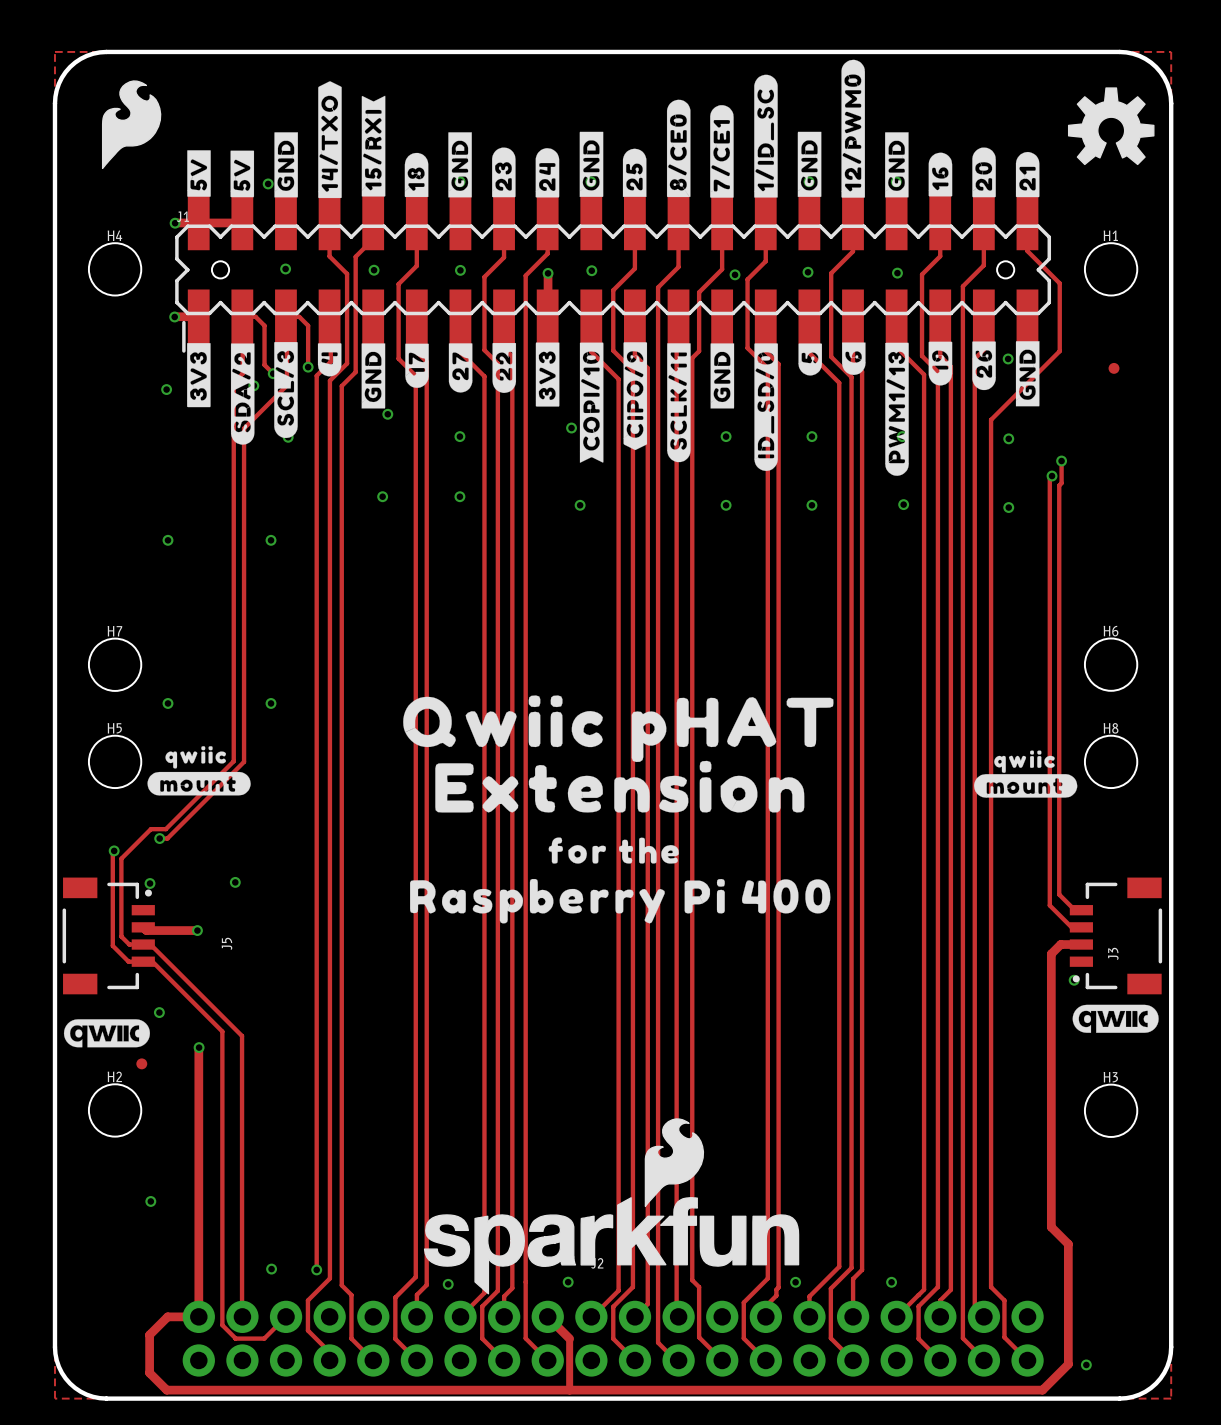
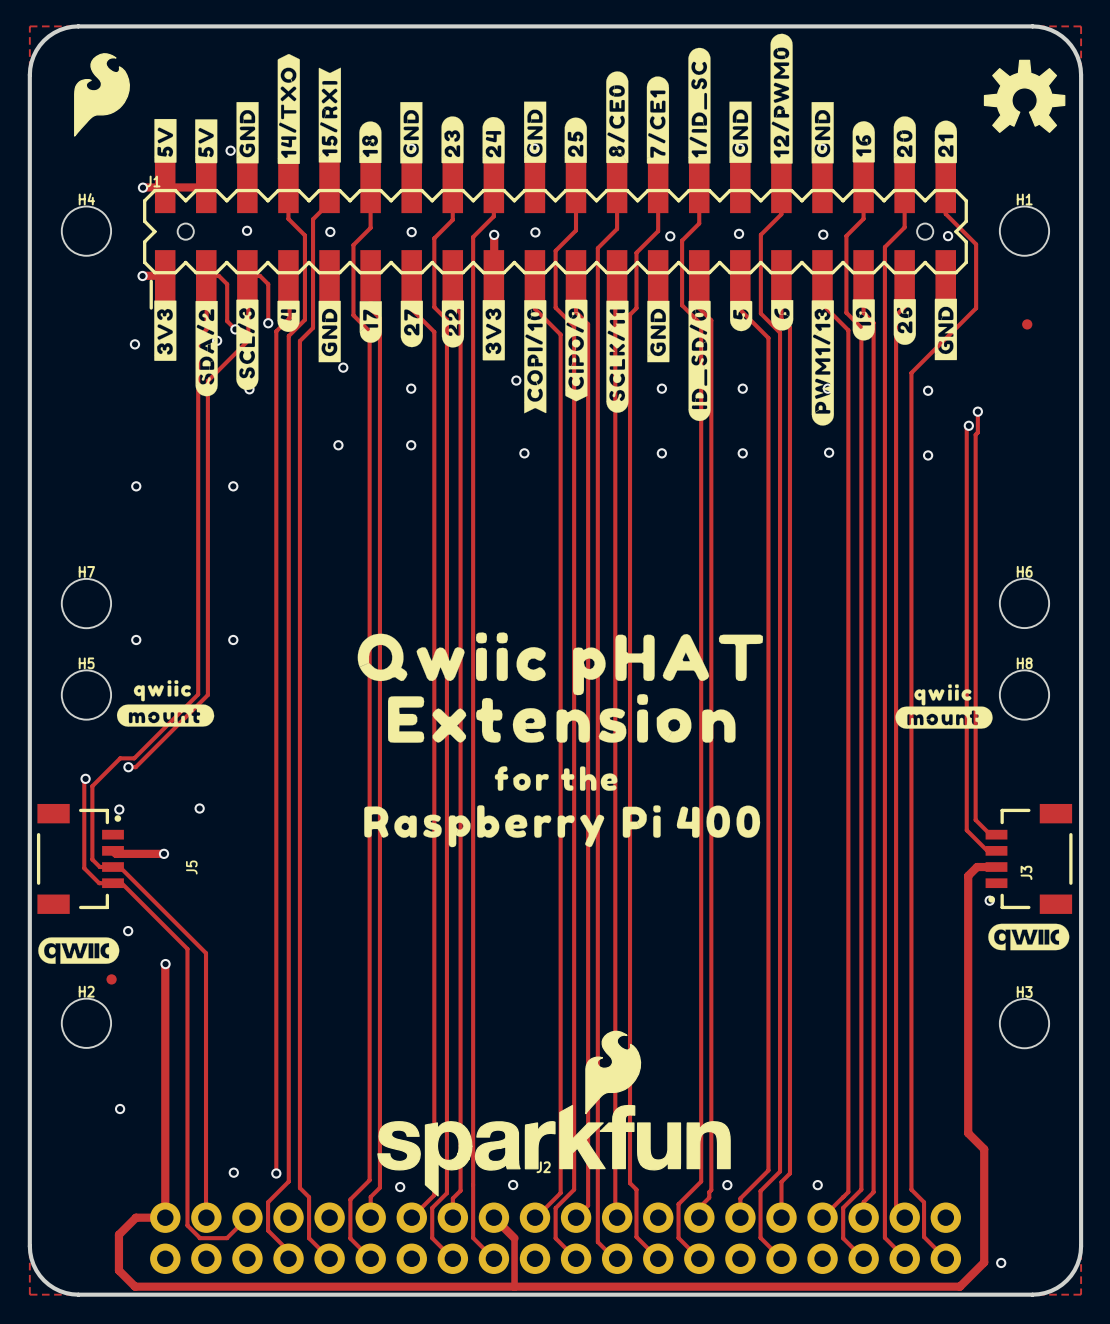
via position: (1008, 358) -> (948, 236)

